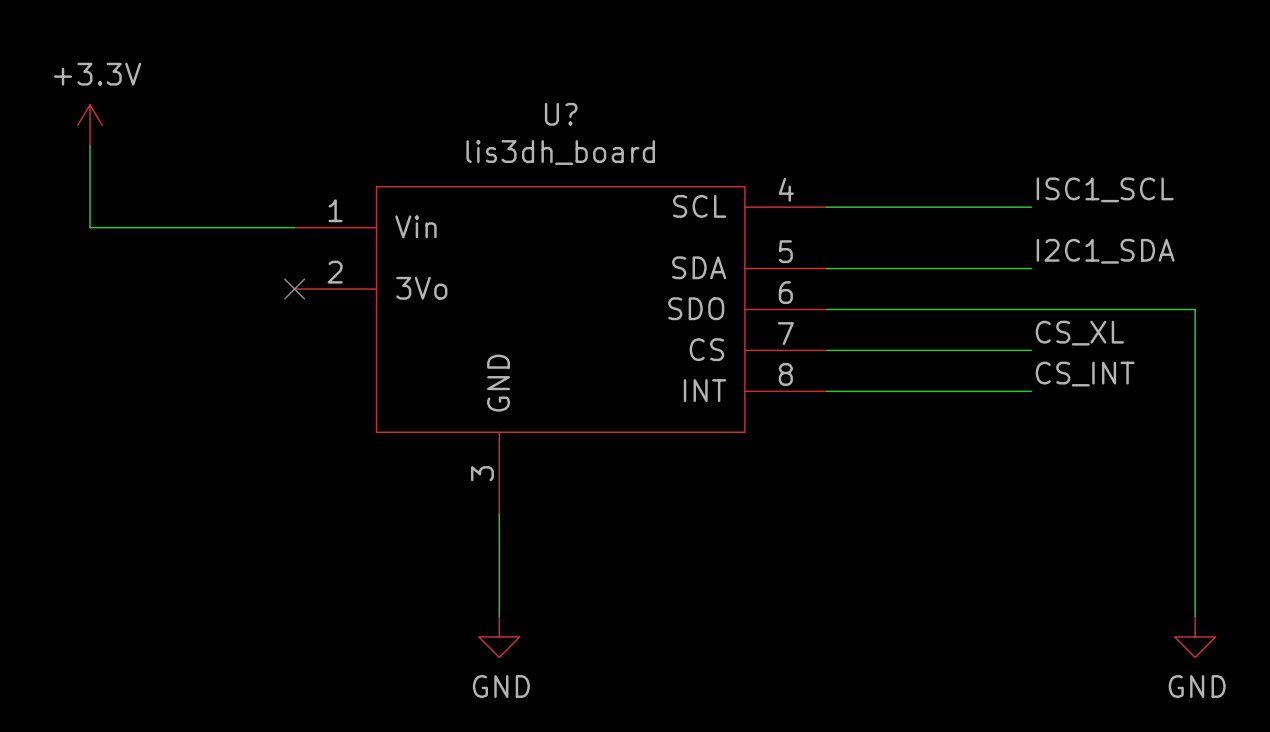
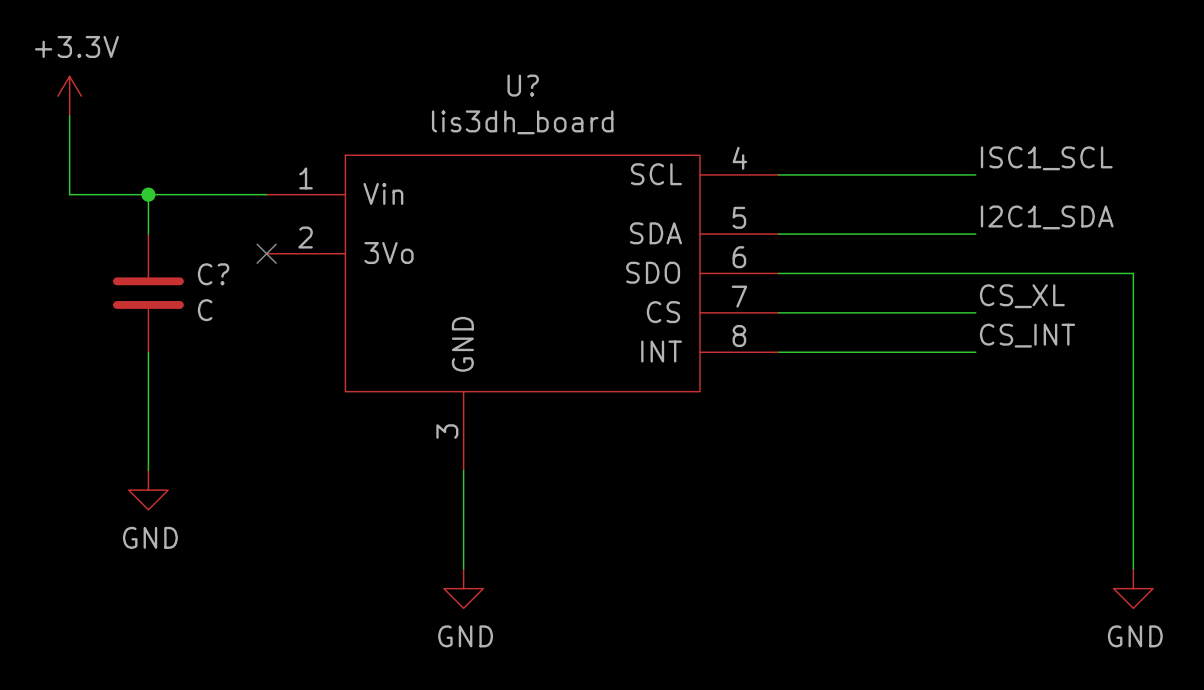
wire: none -> (148, 194) (148, 234)
junction: none -> (148, 194)
C?: none -> C (148, 293)
wire: none -> (148, 352) (148, 470)
power symbol: none -> GND (148, 490)

